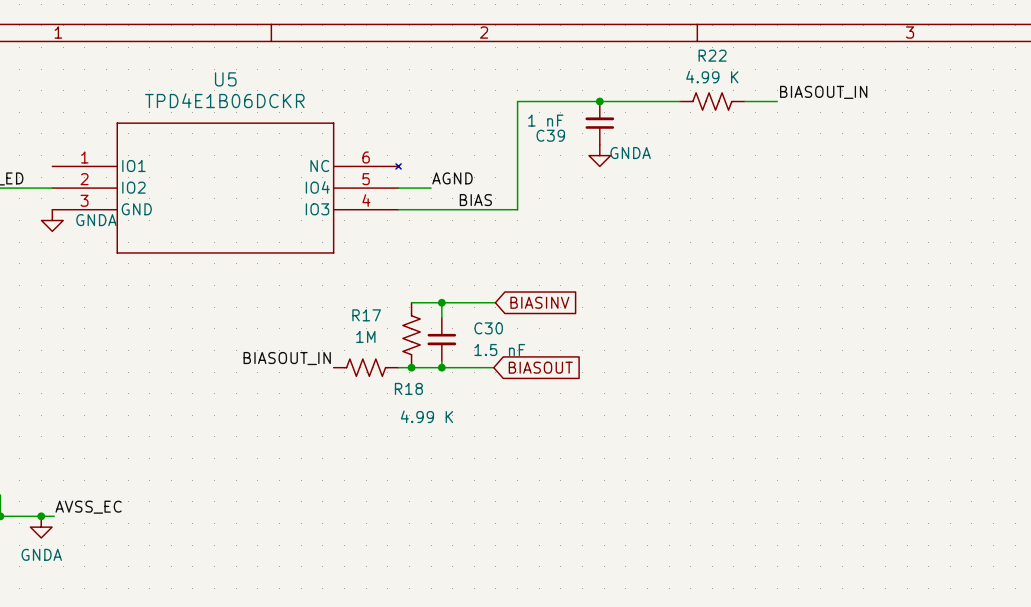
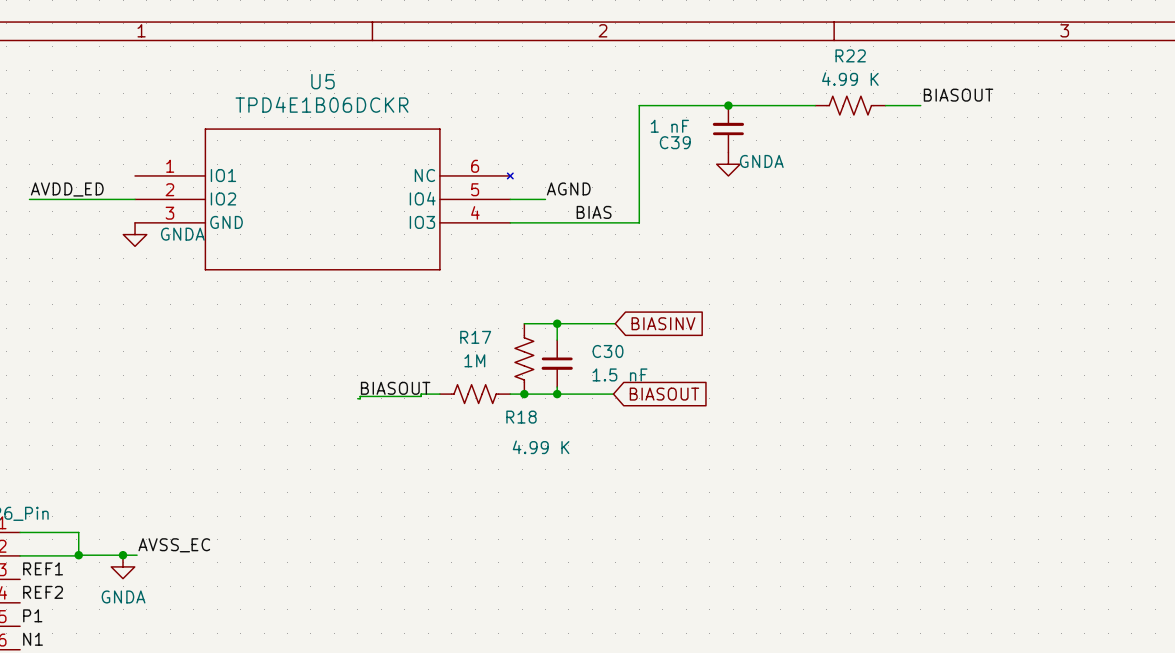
label: BIASOUT_IN (823, 92) -> BIASOUT (958, 95)
label: BIASOUT_IN (287, 358) -> BIASOUT (395, 388)
wire: none -> (439, 394) (421, 394) (421, 396) (360, 396) (360, 398) (357, 398)

